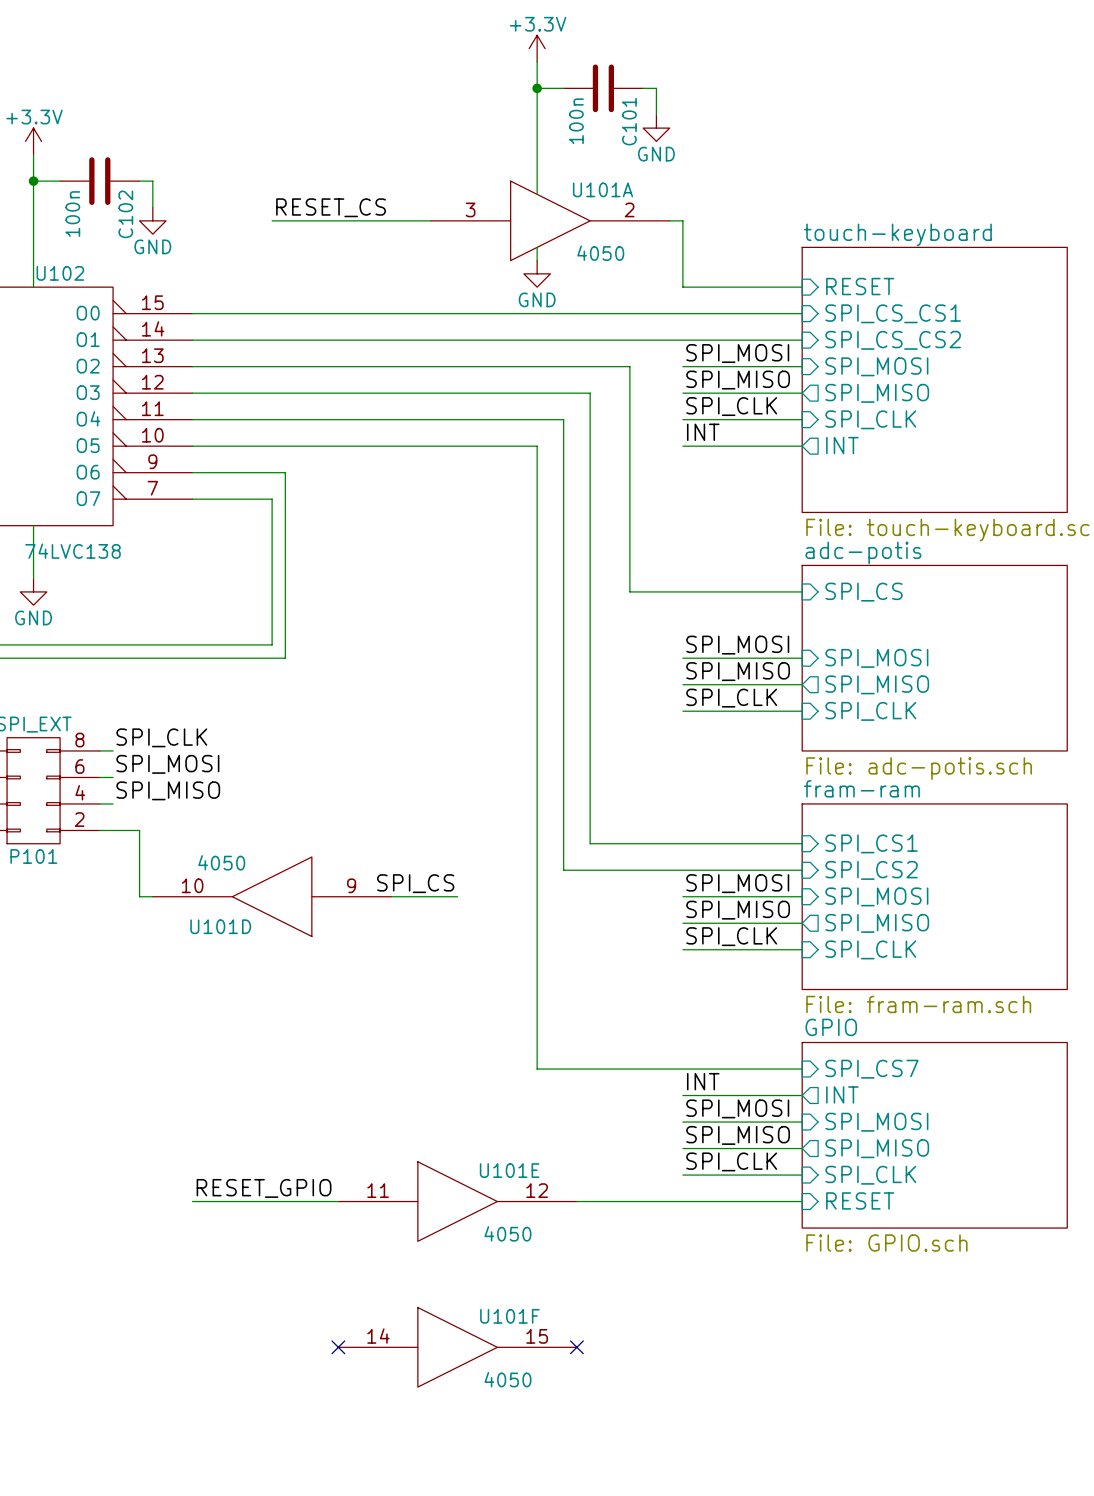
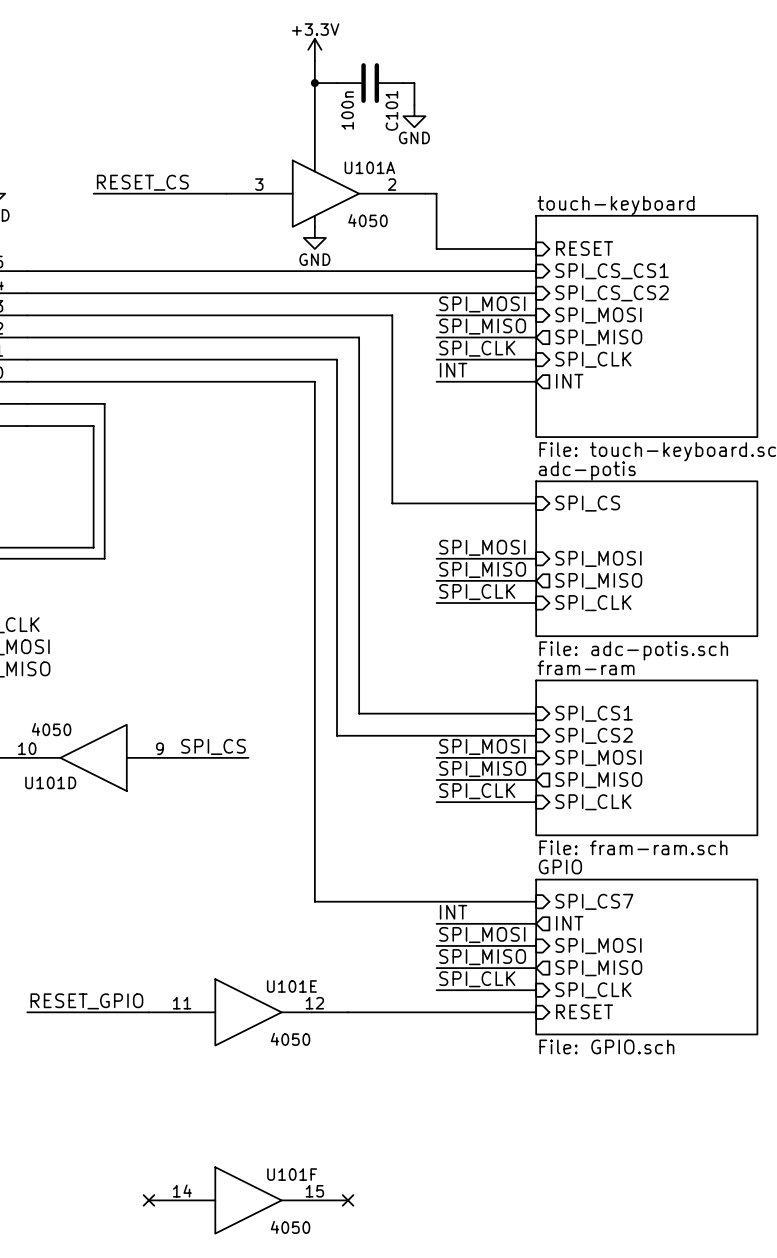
no-connect mark: (338, 1347) -> none
U101F position: (457, 1347) -> (248, 1200)
no-connect mark: (576, 1347) -> none
no-connect mark: none -> (148, 1200)
no-connect mark: none -> (348, 1200)

